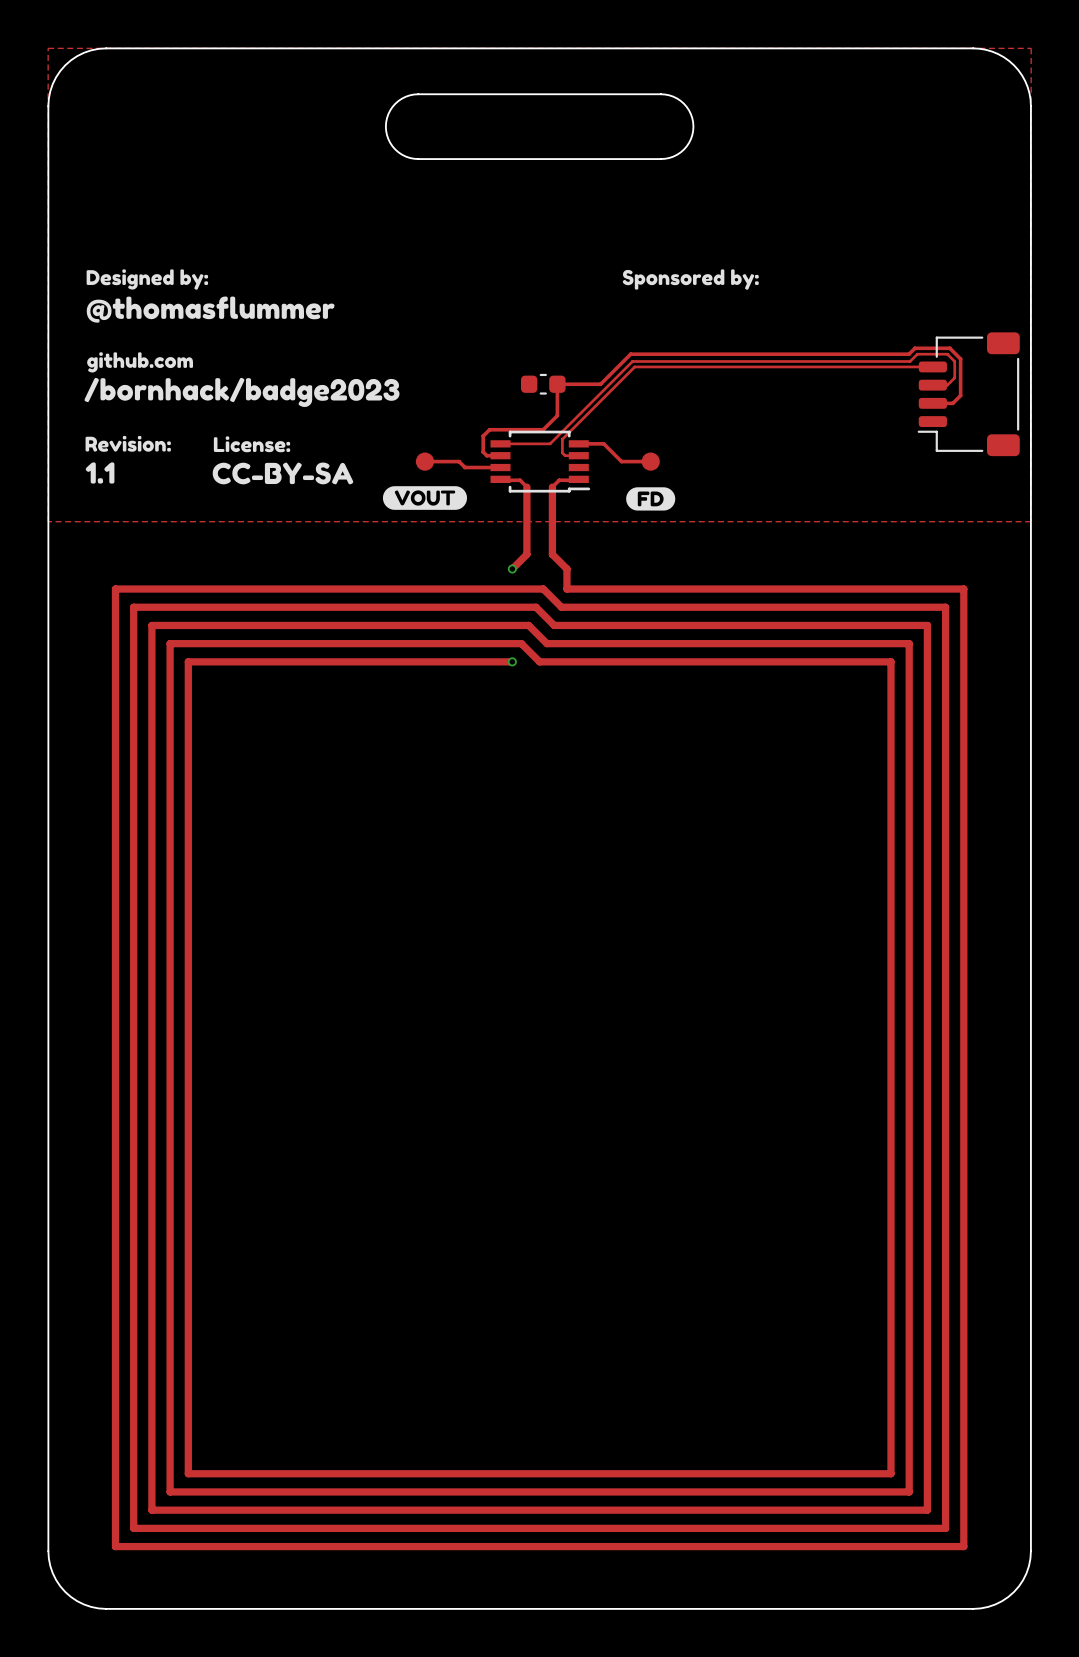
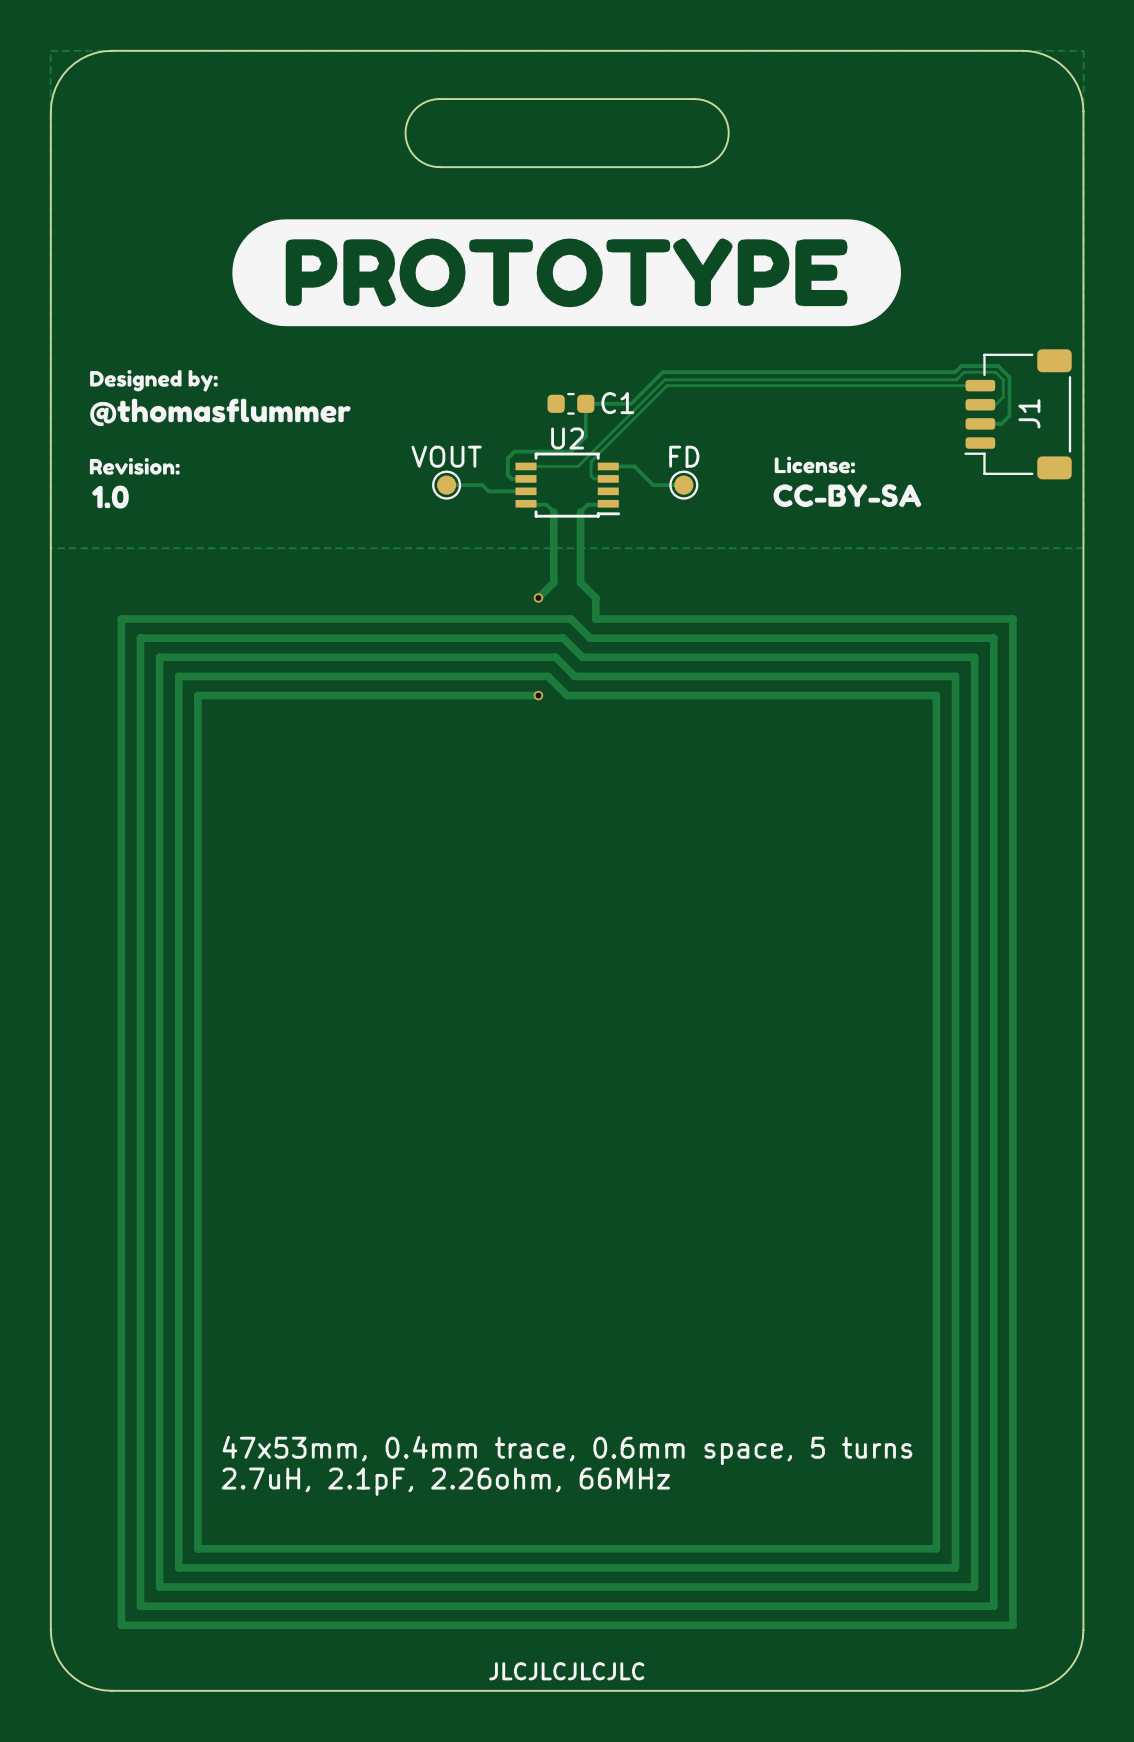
drawing: none -> [232, 219, 901, 327]
drawing: [622, 269, 759, 290] -> none
drawing position: (147, 279) -> (153, 380)
drawing position: (210, 309) -> (220, 412)
drawing: [84, 352, 400, 408] -> none
C1 name: none -> C1 (617, 403)
J1 name: none -> J1 (1029, 413)
U2 name: none -> U2 (567, 438)
drawing: none -> [773, 456, 922, 508]
drawing: [212, 436, 354, 485] -> none
part: (424, 461) -> none
VOUT: none -> (446, 485)
part: (650, 461) -> none
FD: none -> (683, 485)
drawing shape: [85, 462, 115, 484] -> [91, 485, 129, 509]
drawing: [382, 486, 468, 510] -> none
drawing: [626, 487, 676, 511] -> none
text: none -> 47x53mm, 0.4mm trace, 0.6mm space, 5 turns (567, 1450)
text: none -> 2.7uH, 2.1pF, 2.26ohm, 66MHz (445, 1481)
text: none -> JLCJLCJLCJLC (566, 1671)

